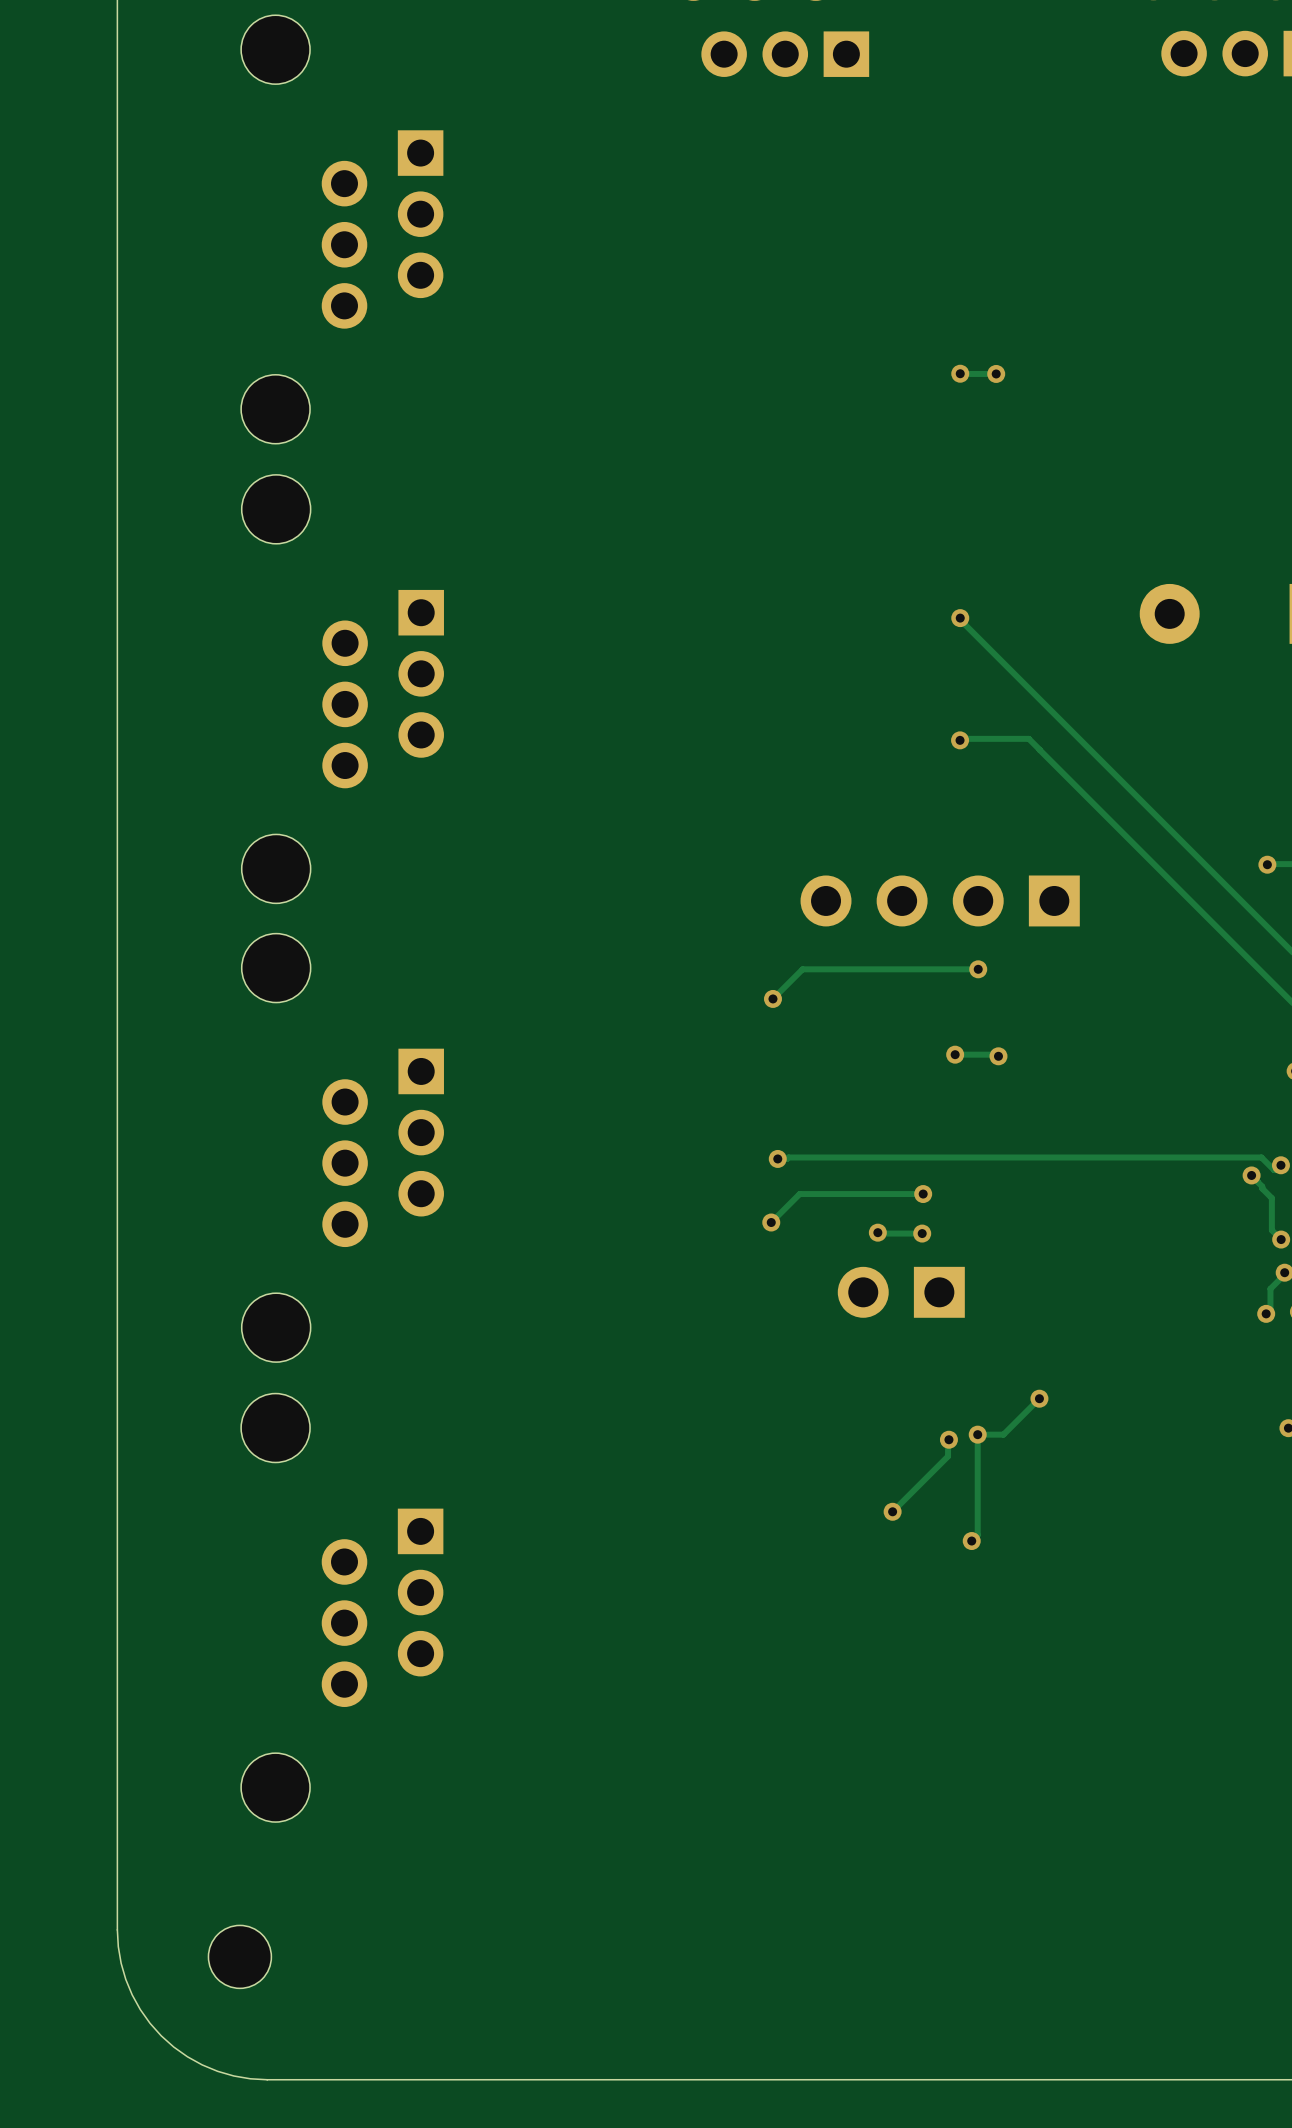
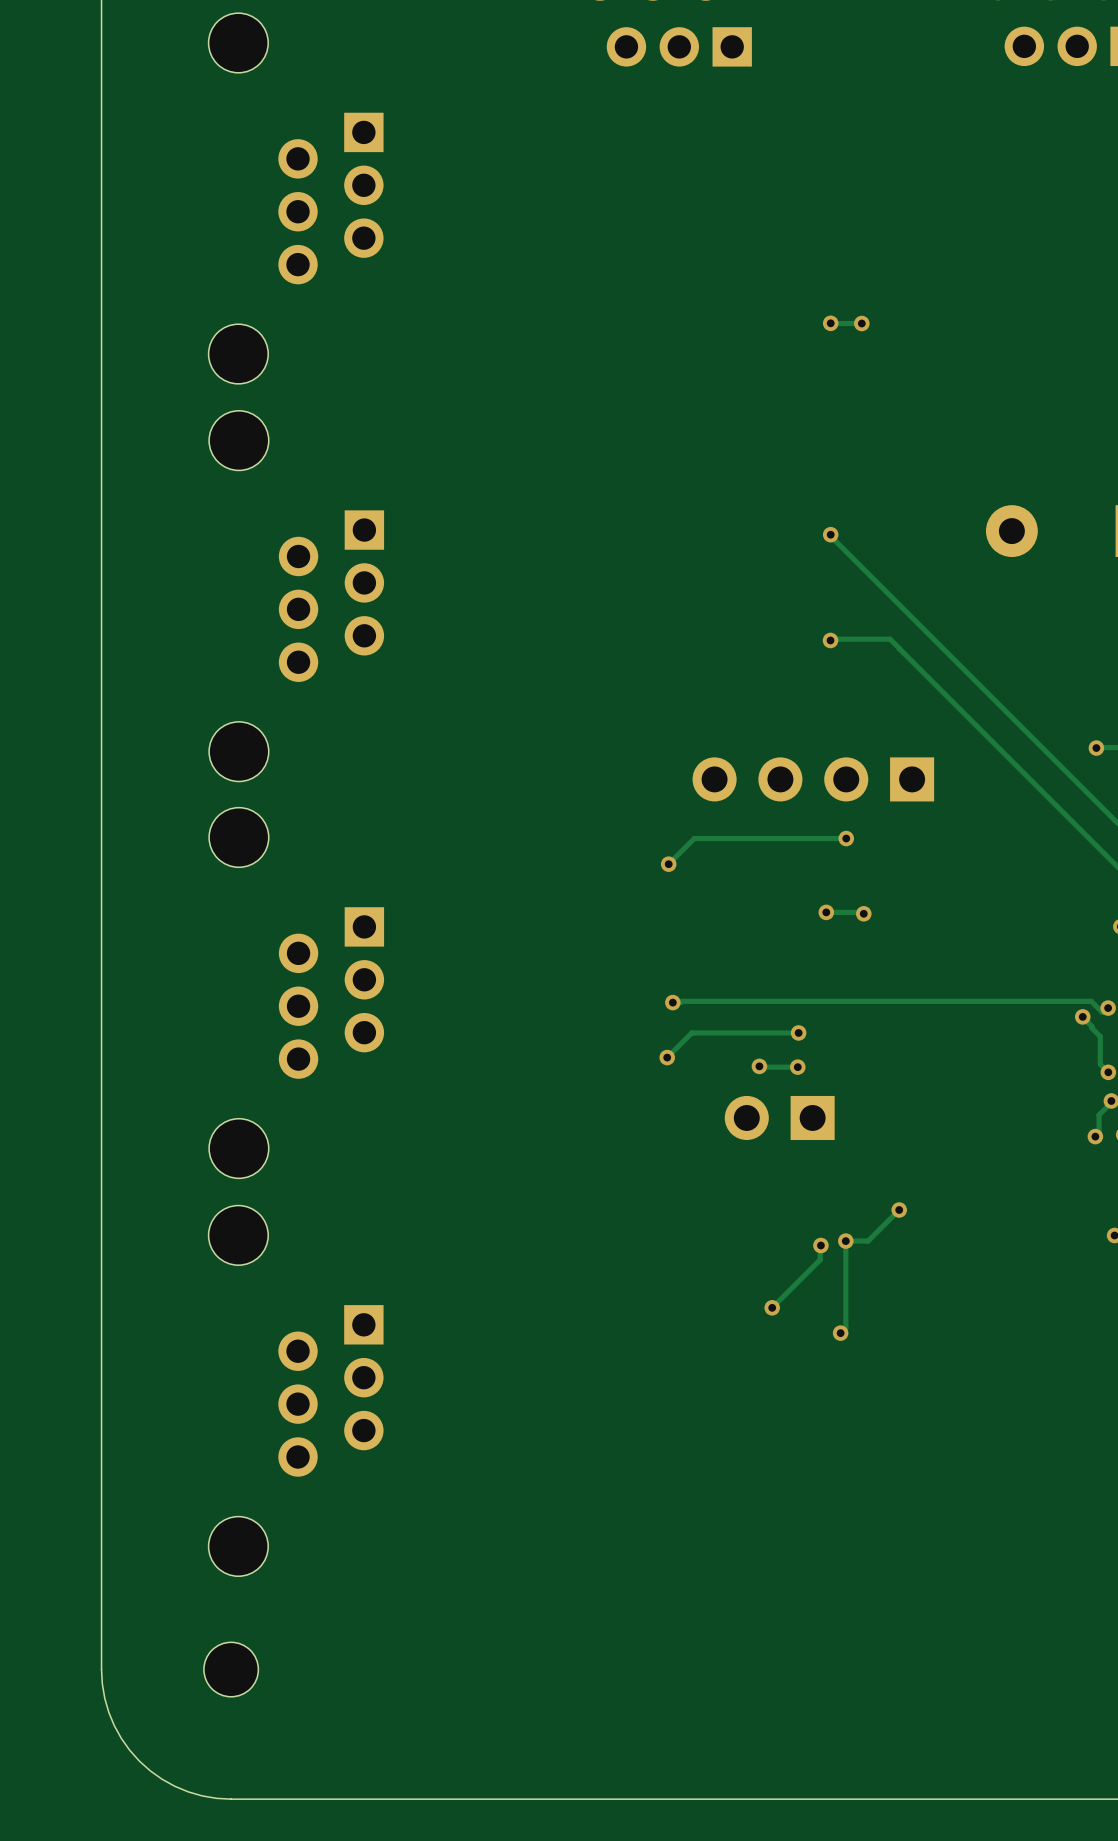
part position: (239, 1956) -> (231, 1669)

